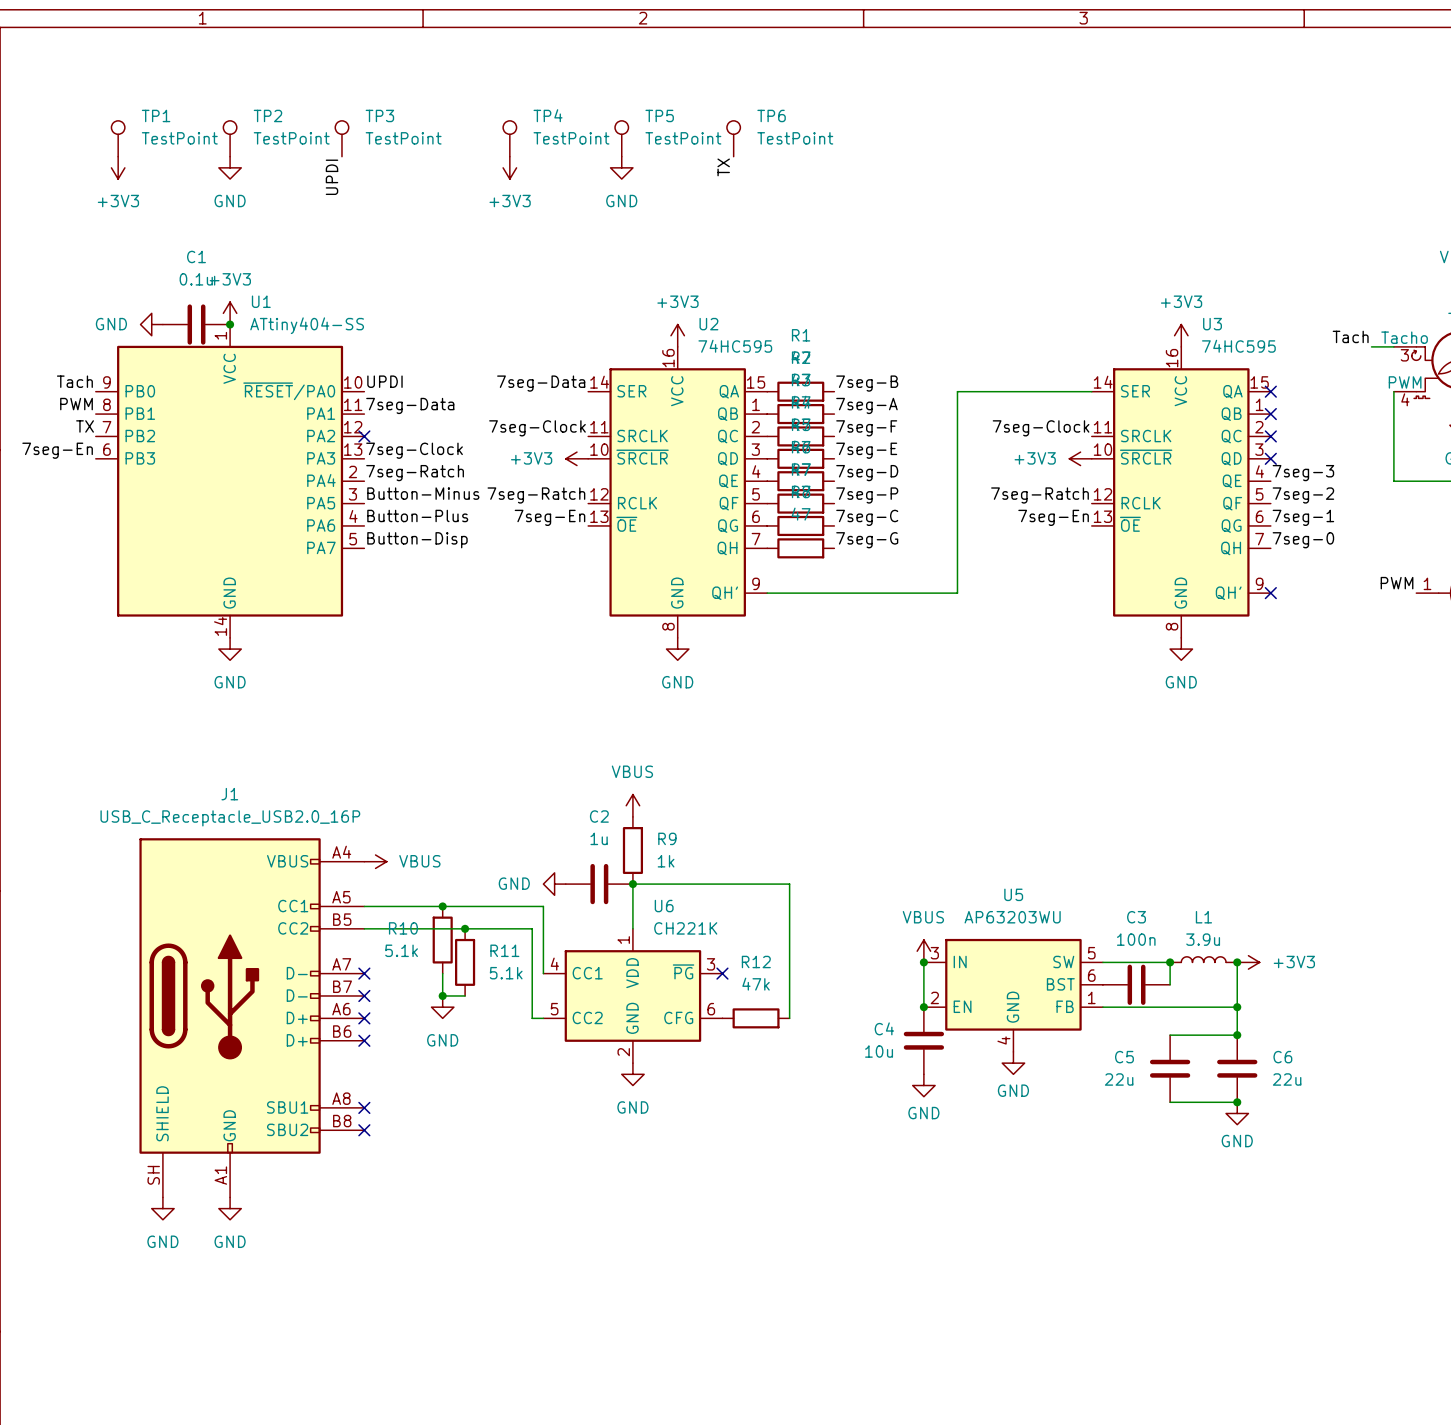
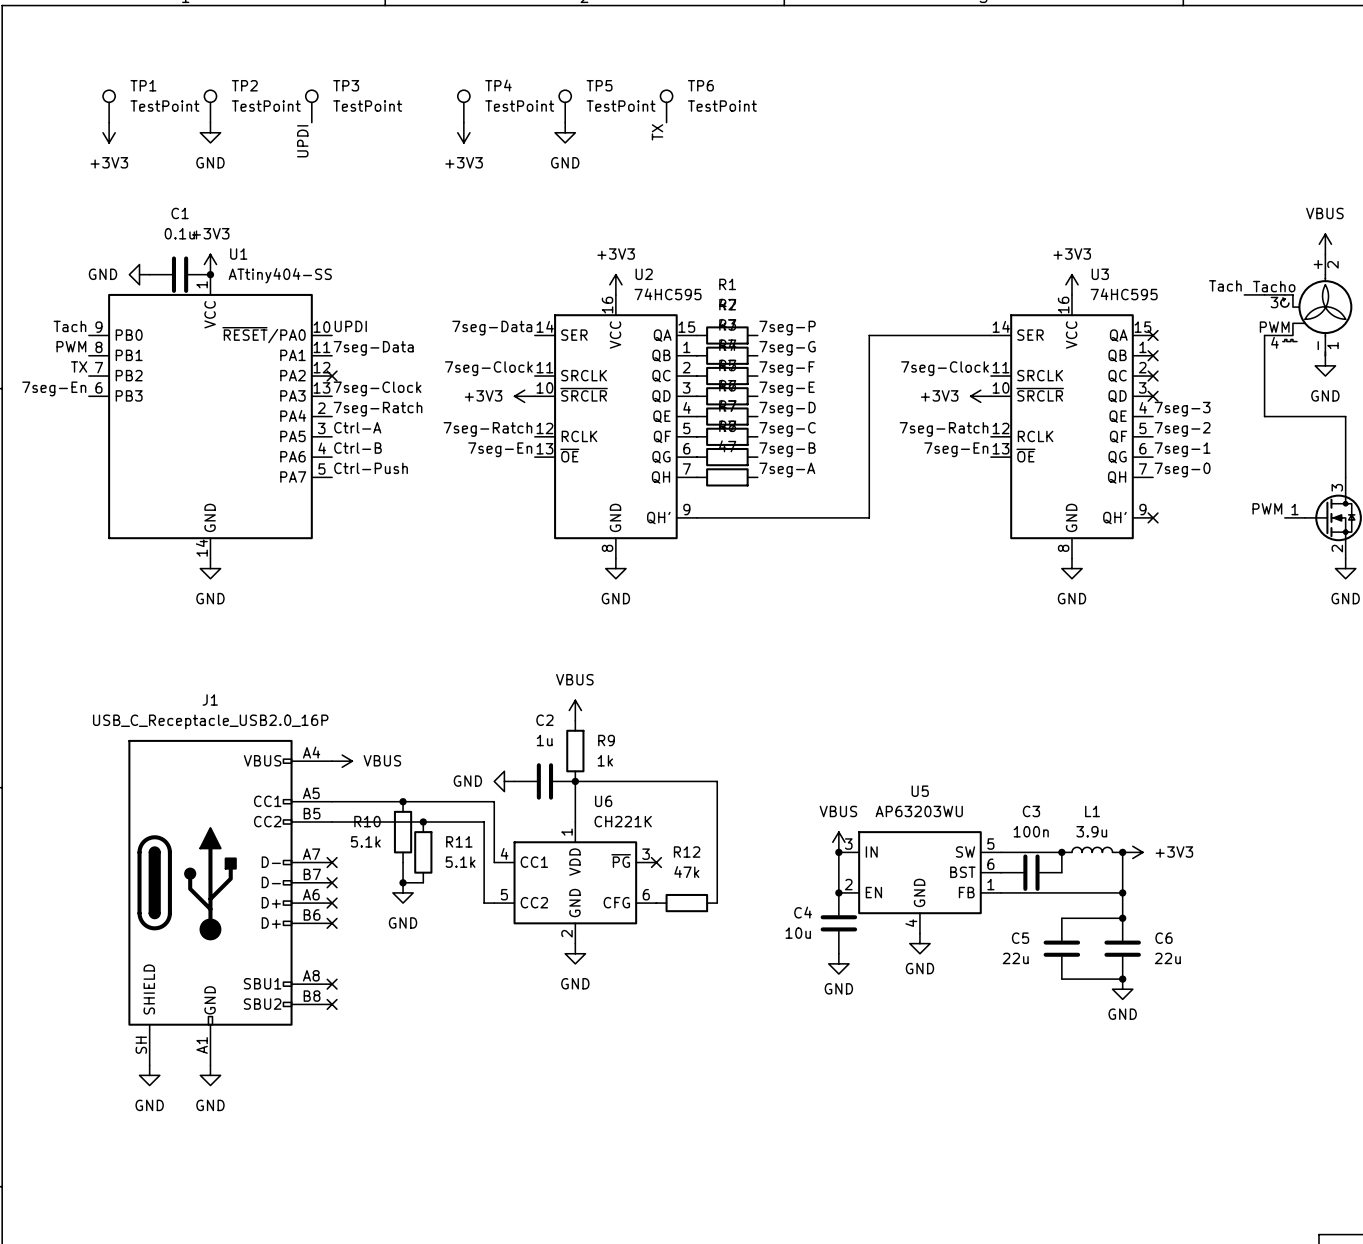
label: 7seg-B (867, 383) -> 7seg-P (787, 328)
label: 7seg-A (866, 405) -> 7seg-G (787, 348)
label: Button-Minus (423, 493) -> Ctrl-A (357, 427)
label: 7seg-P (867, 495) -> 7seg-C (787, 429)
label: Button-Plus (417, 515) -> Ctrl-B (357, 448)
label: 7seg-C (867, 517) -> 7seg-B (787, 449)
label: Button-Disp (417, 540) -> Ctrl-Push (371, 468)
label: 7seg-G (867, 540) -> 7seg-A (787, 470)

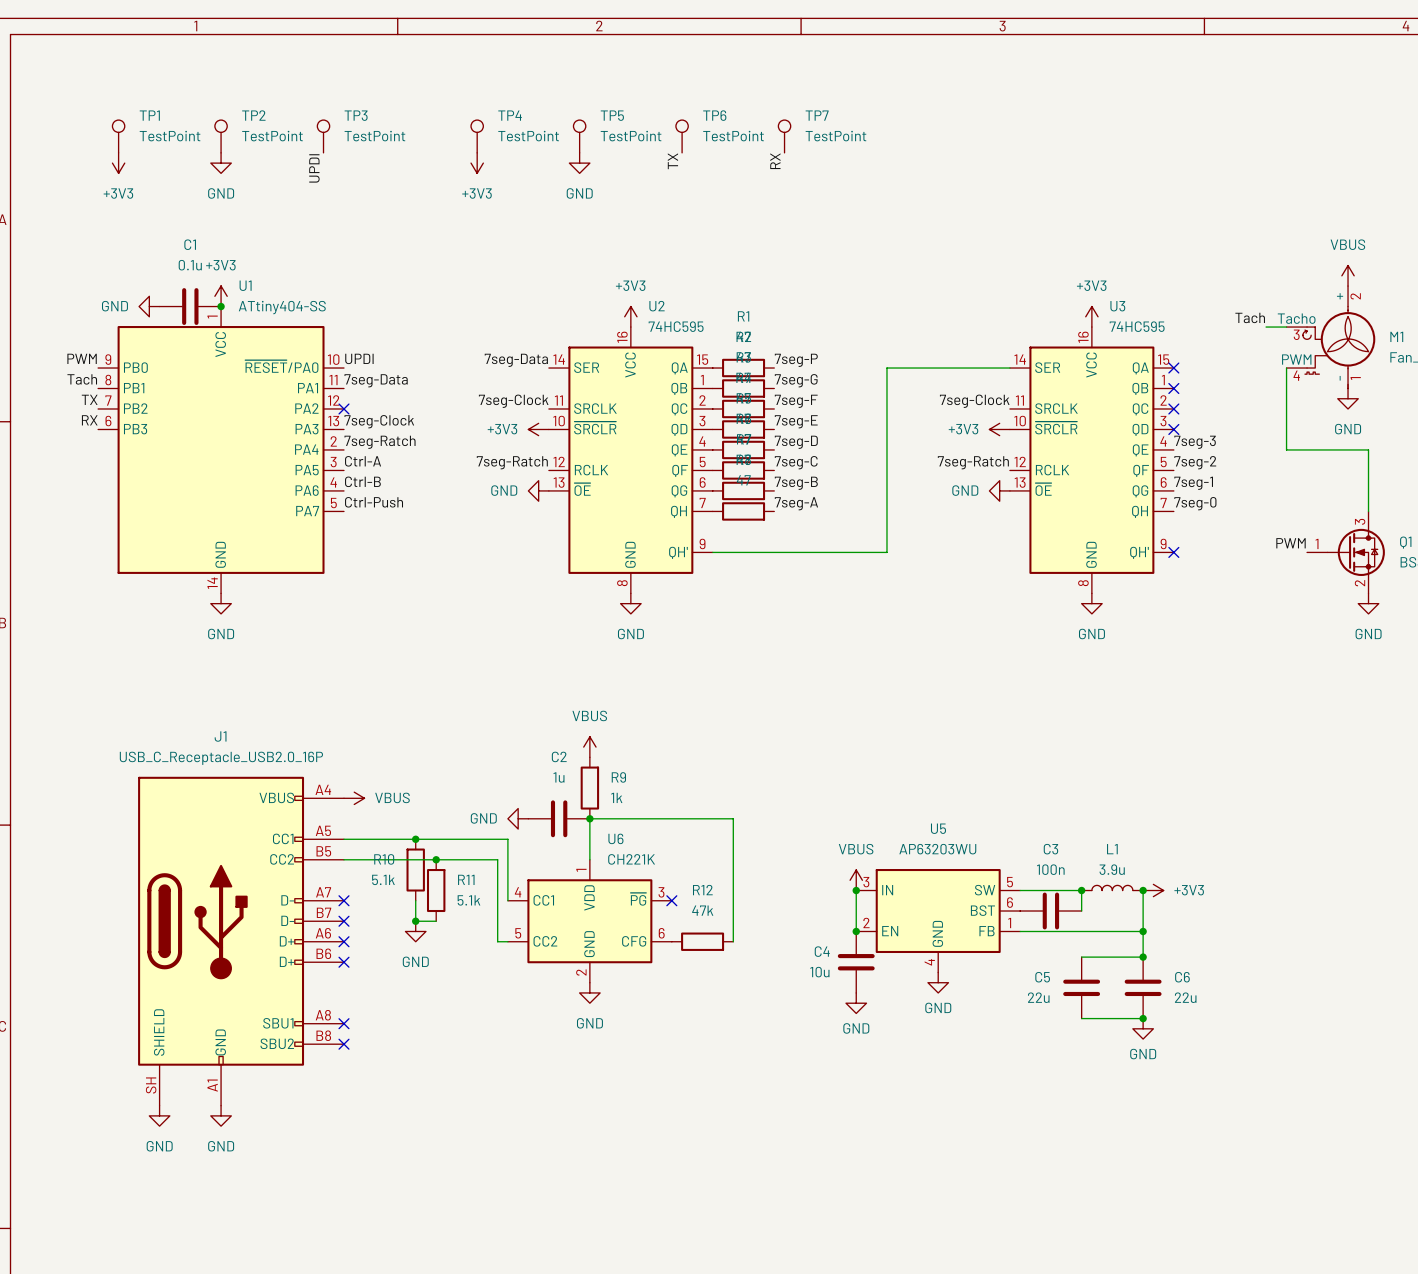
TP7: none -> TestPoint (784, 136)
label: none -> RX (775, 161)
label: Tach (69, 326) -> PWM (82, 358)
label: PWM (71, 346) -> Tach (82, 379)
label: 7seg-En (54, 388) -> RX (89, 420)
label: 7seg-En (500, 449) -> none
label: 7seg-En (956, 449) -> none
power symbol: none -> GND (538, 490)
power symbol: none -> GND (999, 490)

